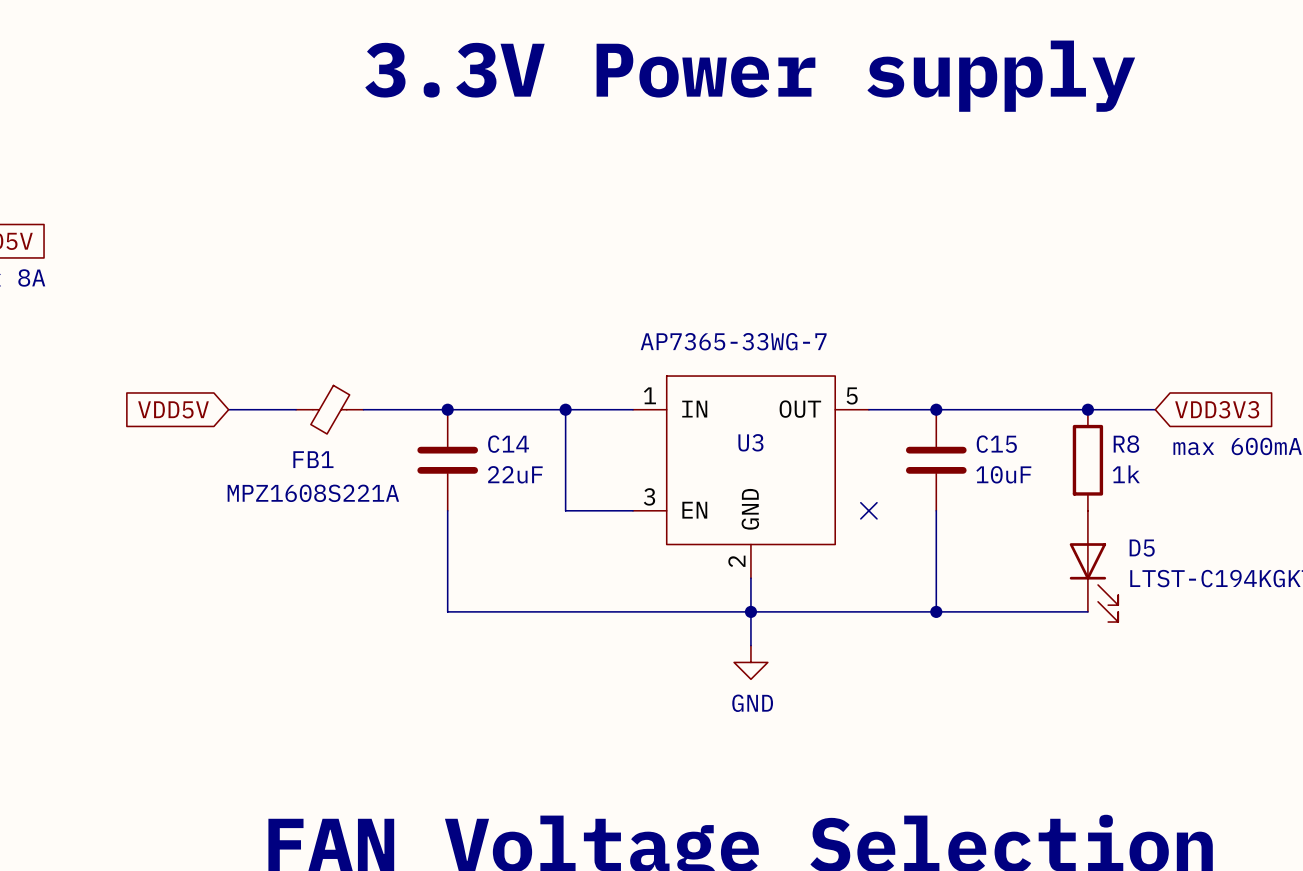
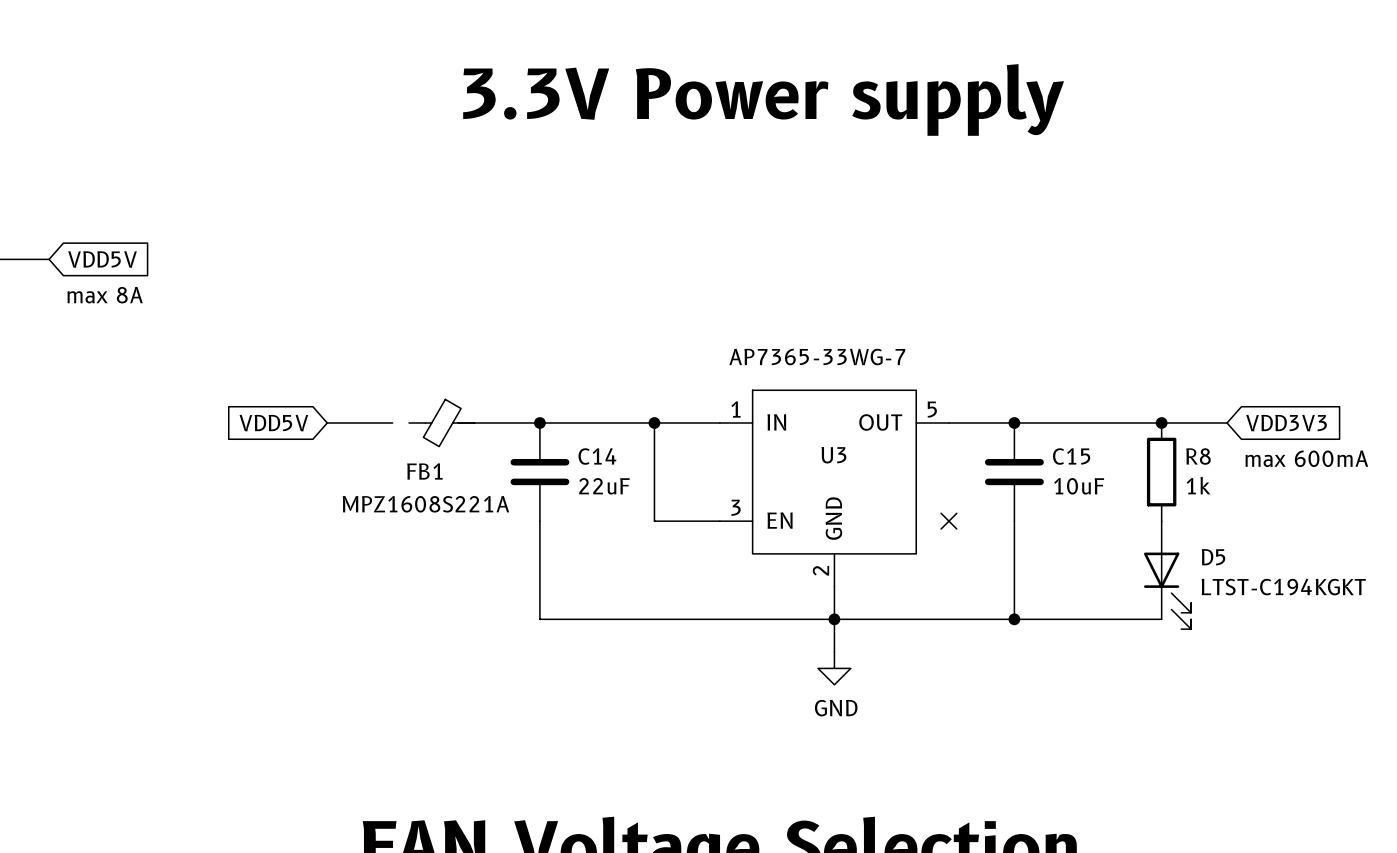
FB1 position: (329, 409) -> (441, 422)

